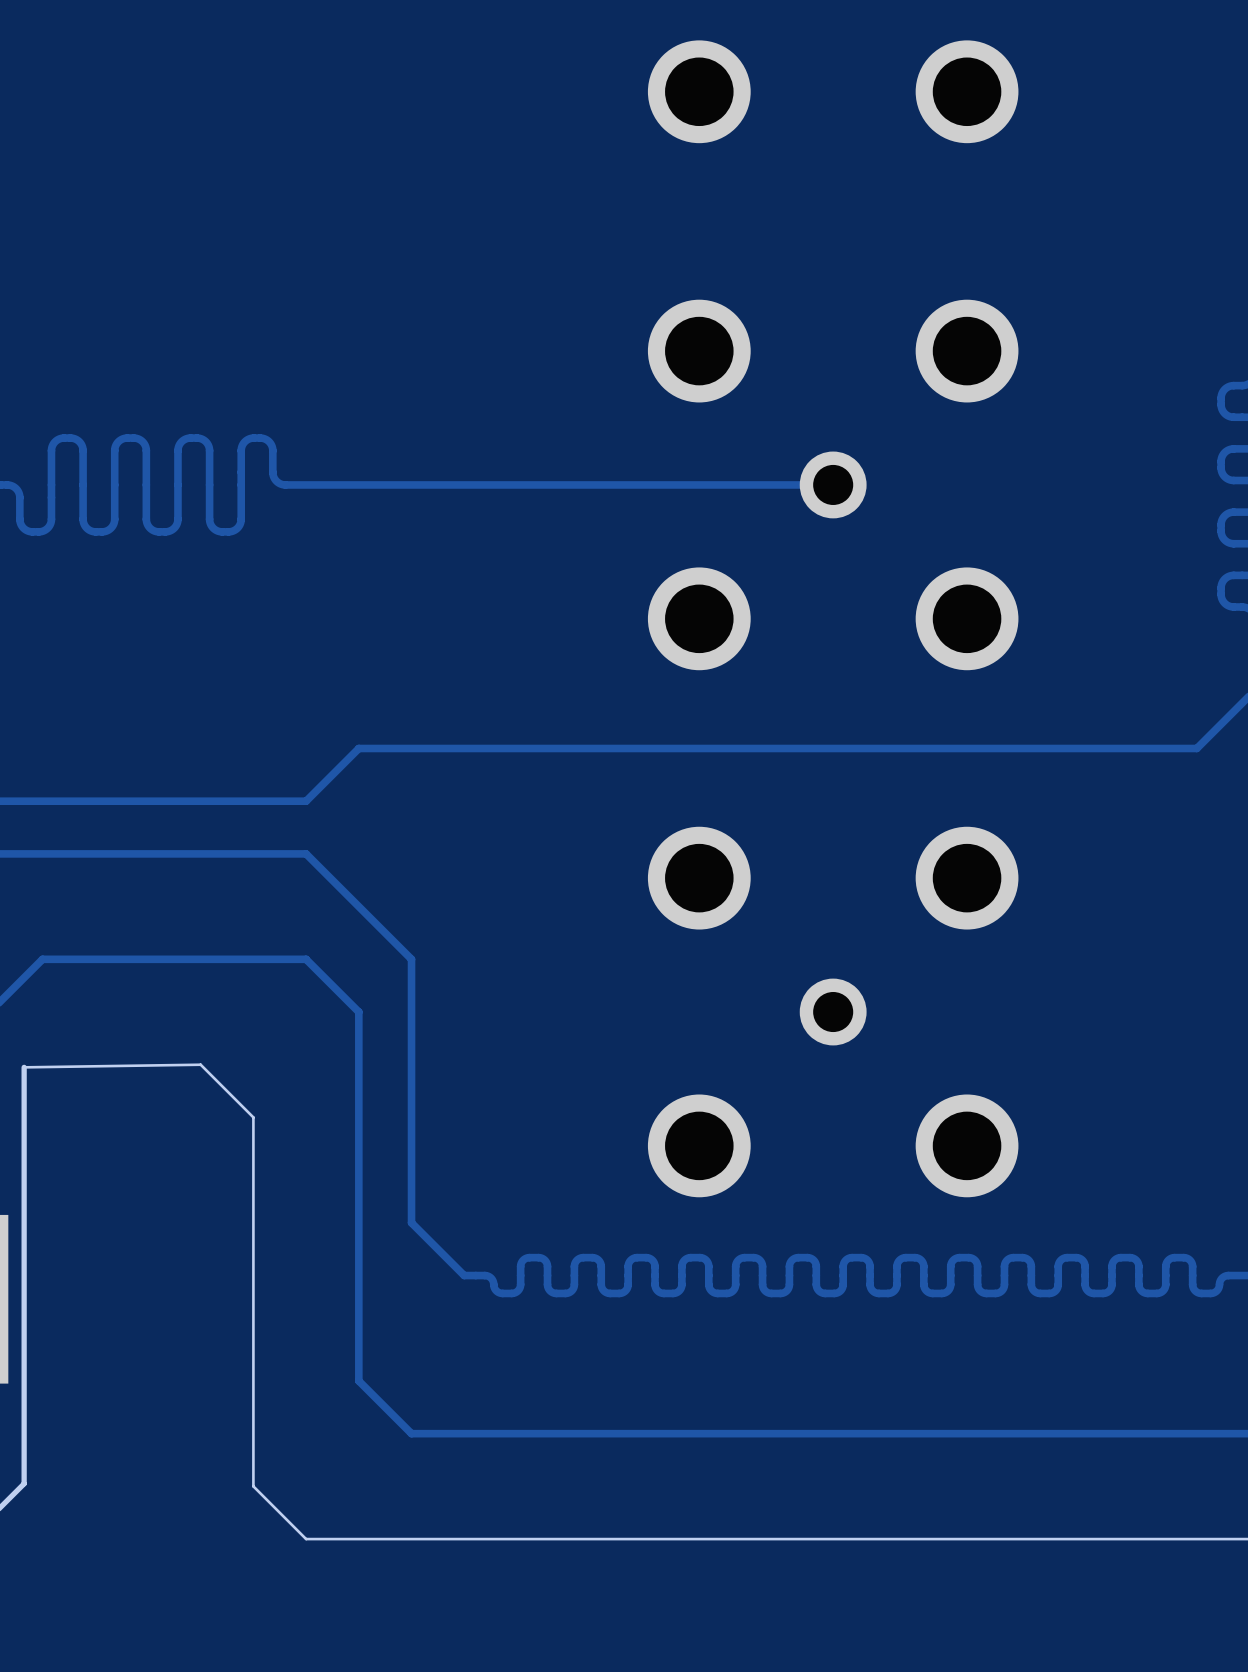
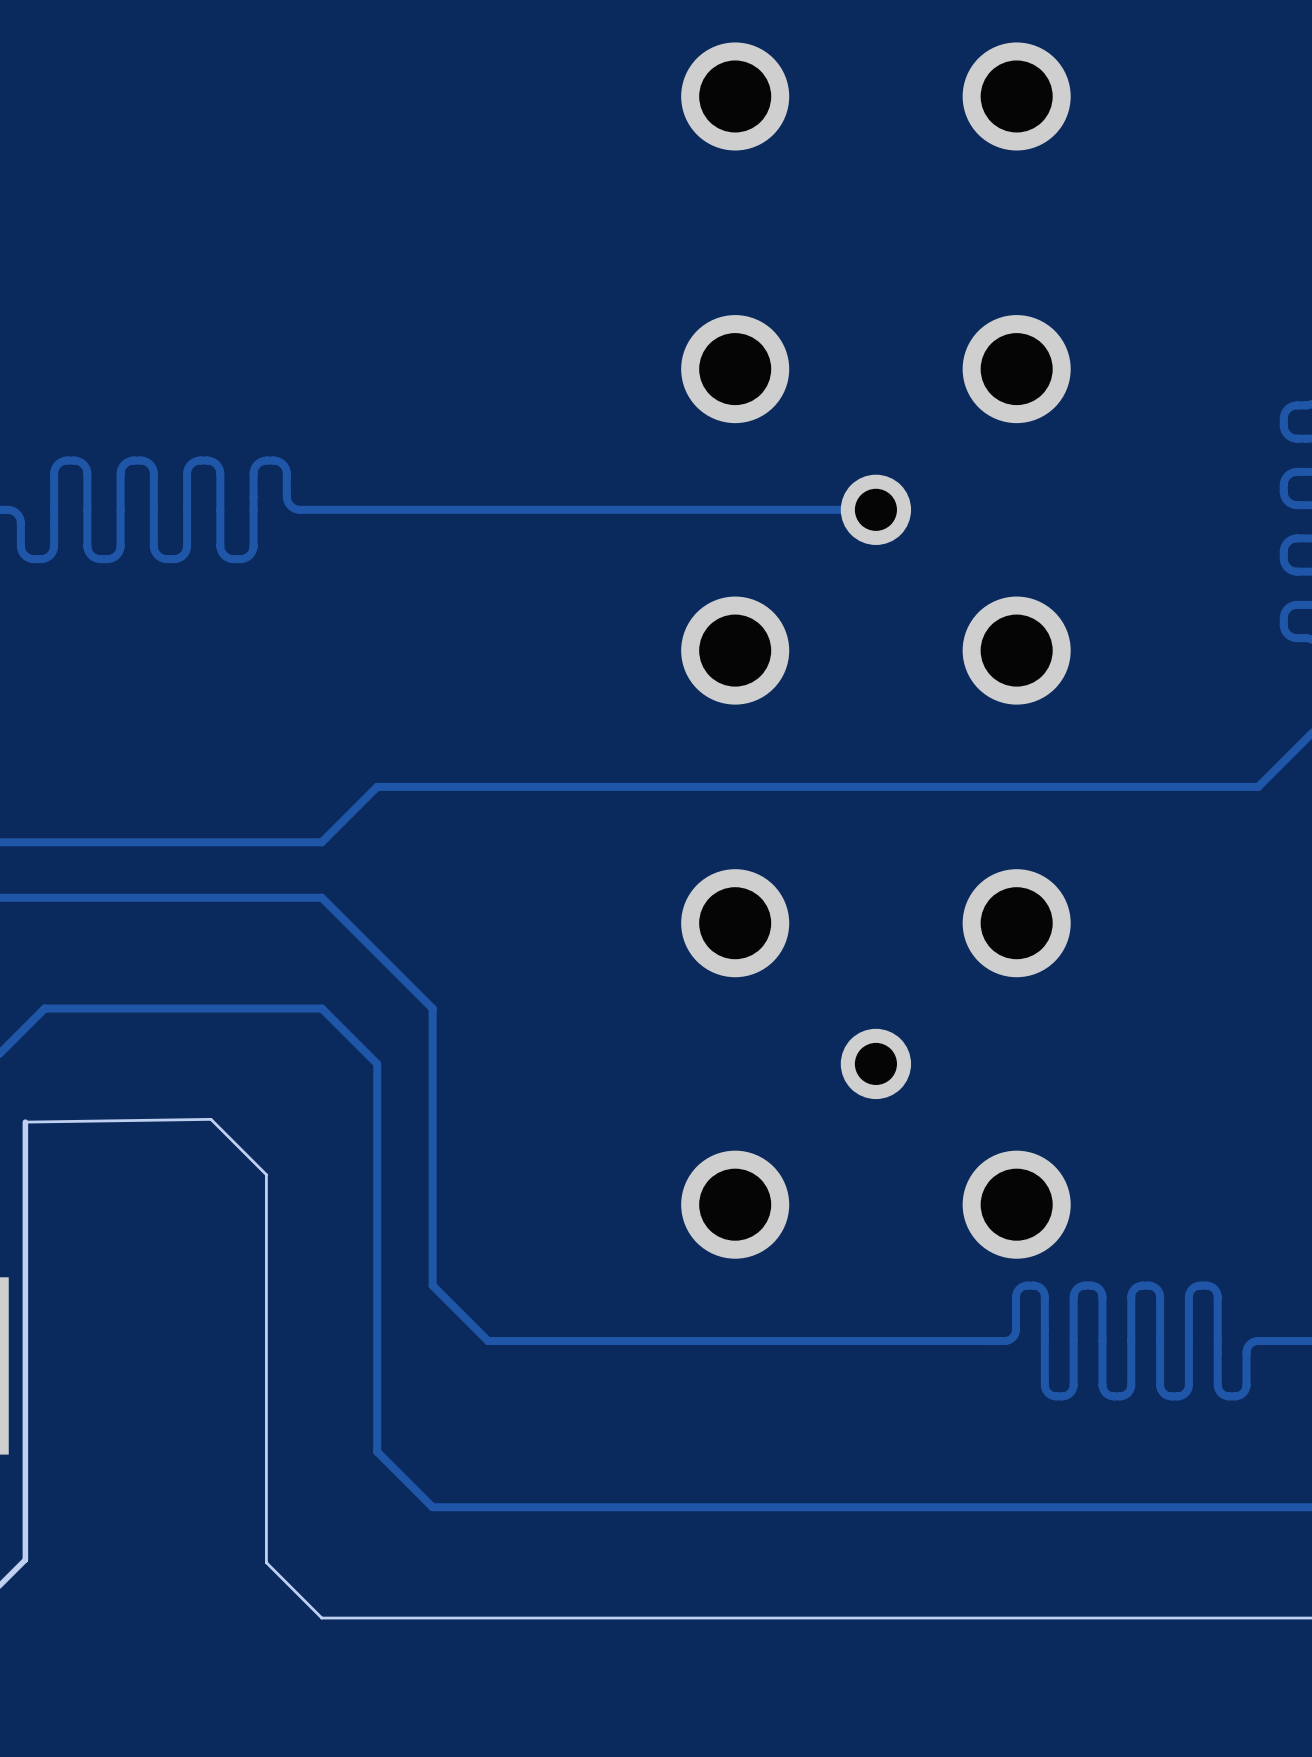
track: (1228, 1275) (1222, 1278) (1217, 1289) (1210, 1293) (1199, 1293) (1194, 1289) (1192, 1264) (1189, 1259) (1183, 1257) (1172, 1257) (1167, 1261) (1165, 1286) (1162, 1291) (1156, 1293) (1145, 1293) (1140, 1289) (1138, 1264) (1135, 1259) (1129, 1257) (1118, 1257) (1113, 1261) (1111, 1286) (1108, 1291) (1103, 1293) (1091, 1293) (1086, 1289) (1084, 1264) (1081, 1259) (1076, 1257) (1064, 1257) (1060, 1261) (1057, 1286) (1054, 1291) (1049, 1293) (1037, 1293) (1033, 1289) (1031, 1264) (1027, 1259) (1022, 1257) (1011, 1257) (1006, 1261) (1004, 1286) (1000, 1291) (995, 1293) (984, 1293) (979, 1289) (977, 1264) (974, 1259) (968, 1257) (957, 1257) (952, 1261) (950, 1286) (947, 1291) (941, 1293) (930, 1293) (925, 1289) (923, 1264) (920, 1259) (914, 1257) (903, 1257) (898, 1261) (896, 1286) (893, 1291) (887, 1293) (876, 1293) (871, 1289) (869, 1264) (866, 1259) (861, 1257) (849, 1257) (845, 1261) (842, 1286) (839, 1291) (834, 1293) (822, 1293) (818, 1289) (816, 1264) (812, 1259) (807, 1257) (796, 1257) (791, 1261) (789, 1286) (785, 1291) (780, 1293) (769, 1293) (764, 1289) (762, 1264) (759, 1259) (753, 1257) (742, 1257) (737, 1261) (735, 1286) (727, 1293) (716, 1293) (710, 1289) (708, 1264) (701, 1257) (689, 1257) (683, 1261) (681, 1286) (674, 1293) (662, 1293) (656, 1289) (654, 1264) (647, 1257) (635, 1257) (630, 1261) (627, 1286) (620, 1293) (609, 1293) (603, 1289) (600, 1264) (593, 1257) (582, 1257) (576, 1261) (574, 1286) (566, 1293) (555, 1293) (549, 1289) (547, 1264) (540, 1257) (528, 1257) (522, 1261) (520, 1286) (513, 1293) (498, 1292) (494, 1287) (491, 1279) (484, 1275) -> (1291, 1340) (1256, 1341) (1249, 1344) (1246, 1351) (1246, 1387) (1242, 1394) (1235, 1396) (1223, 1394) (1218, 1387) (1217, 1295) (1214, 1288) (1207, 1285) (1196, 1286) (1189, 1294) (1188, 1386) (1185, 1393) (1178, 1396) (1167, 1395) (1160, 1387) (1160, 1295) (1156, 1288) (1150, 1285) (1138, 1286) (1131, 1294) (1131, 1386) (1127, 1393) (1121, 1396) (1109, 1395) (1102, 1387) (1102, 1295) (1099, 1288) (1092, 1285) (1080, 1286) (1074, 1294) (1073, 1386) (1070, 1393) (1063, 1396) (1051, 1395) (1045, 1387) (1044, 1295) (1041, 1288) (1034, 1285) (1024, 1285) (1017, 1291) (1015, 1332) (1011, 1338) (1006, 1340) (509, 1340)

